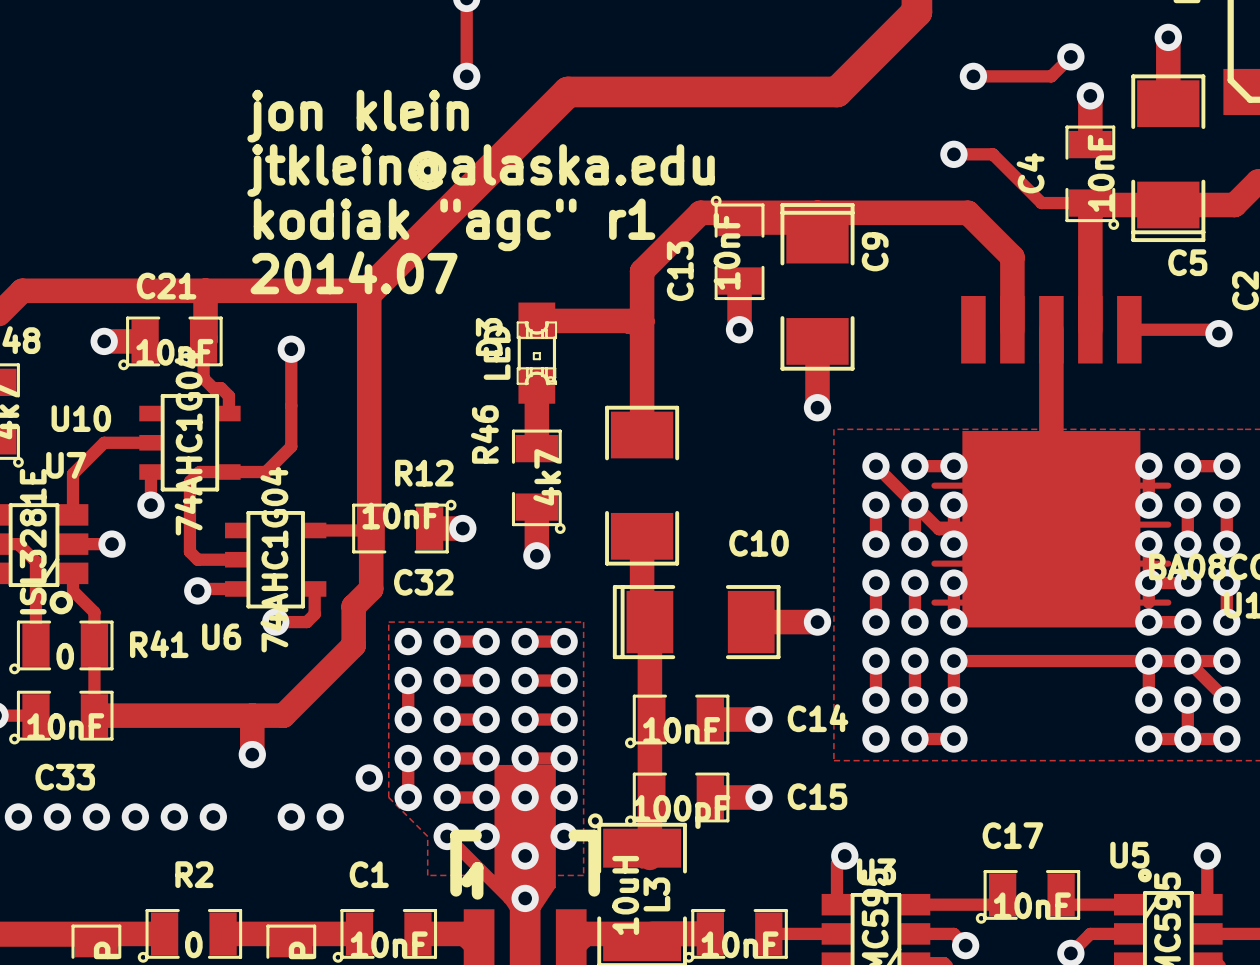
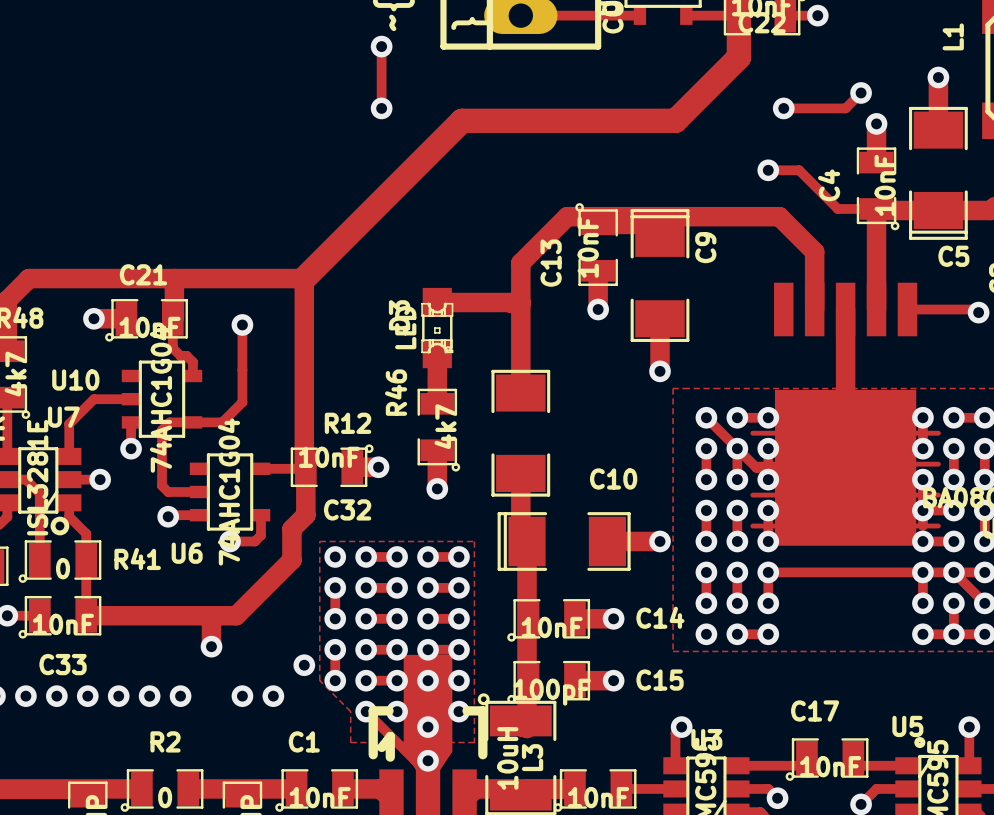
text: jon klein (358, 116) -> none
text: jtklein@alaska.edu (481, 170) -> none
text: kodiak "agc" r1 (454, 224) -> none
text: 2014.07 (354, 272) -> none

